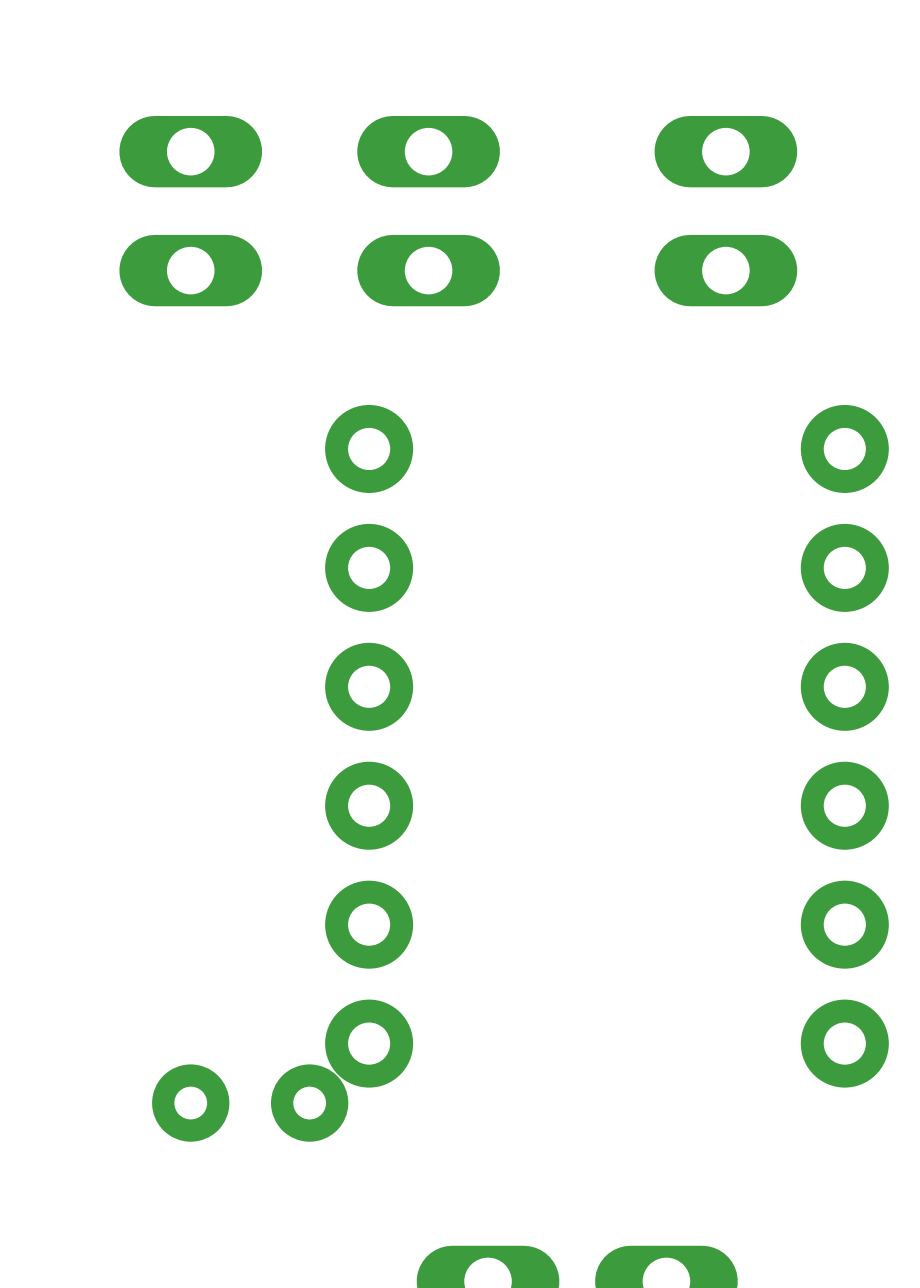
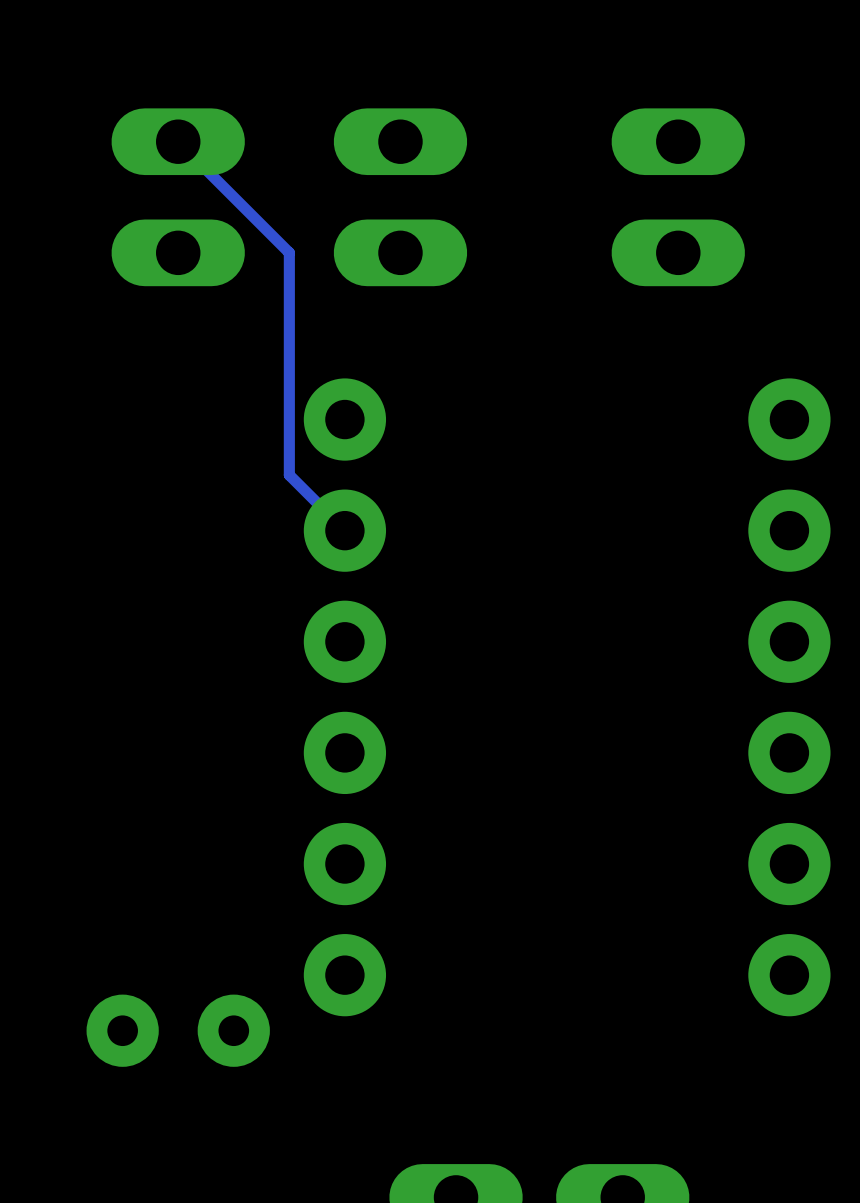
track: none -> (178, 141) (289, 252) (289, 475) (344, 530)
part position: (250, 1103) -> (178, 1030)

